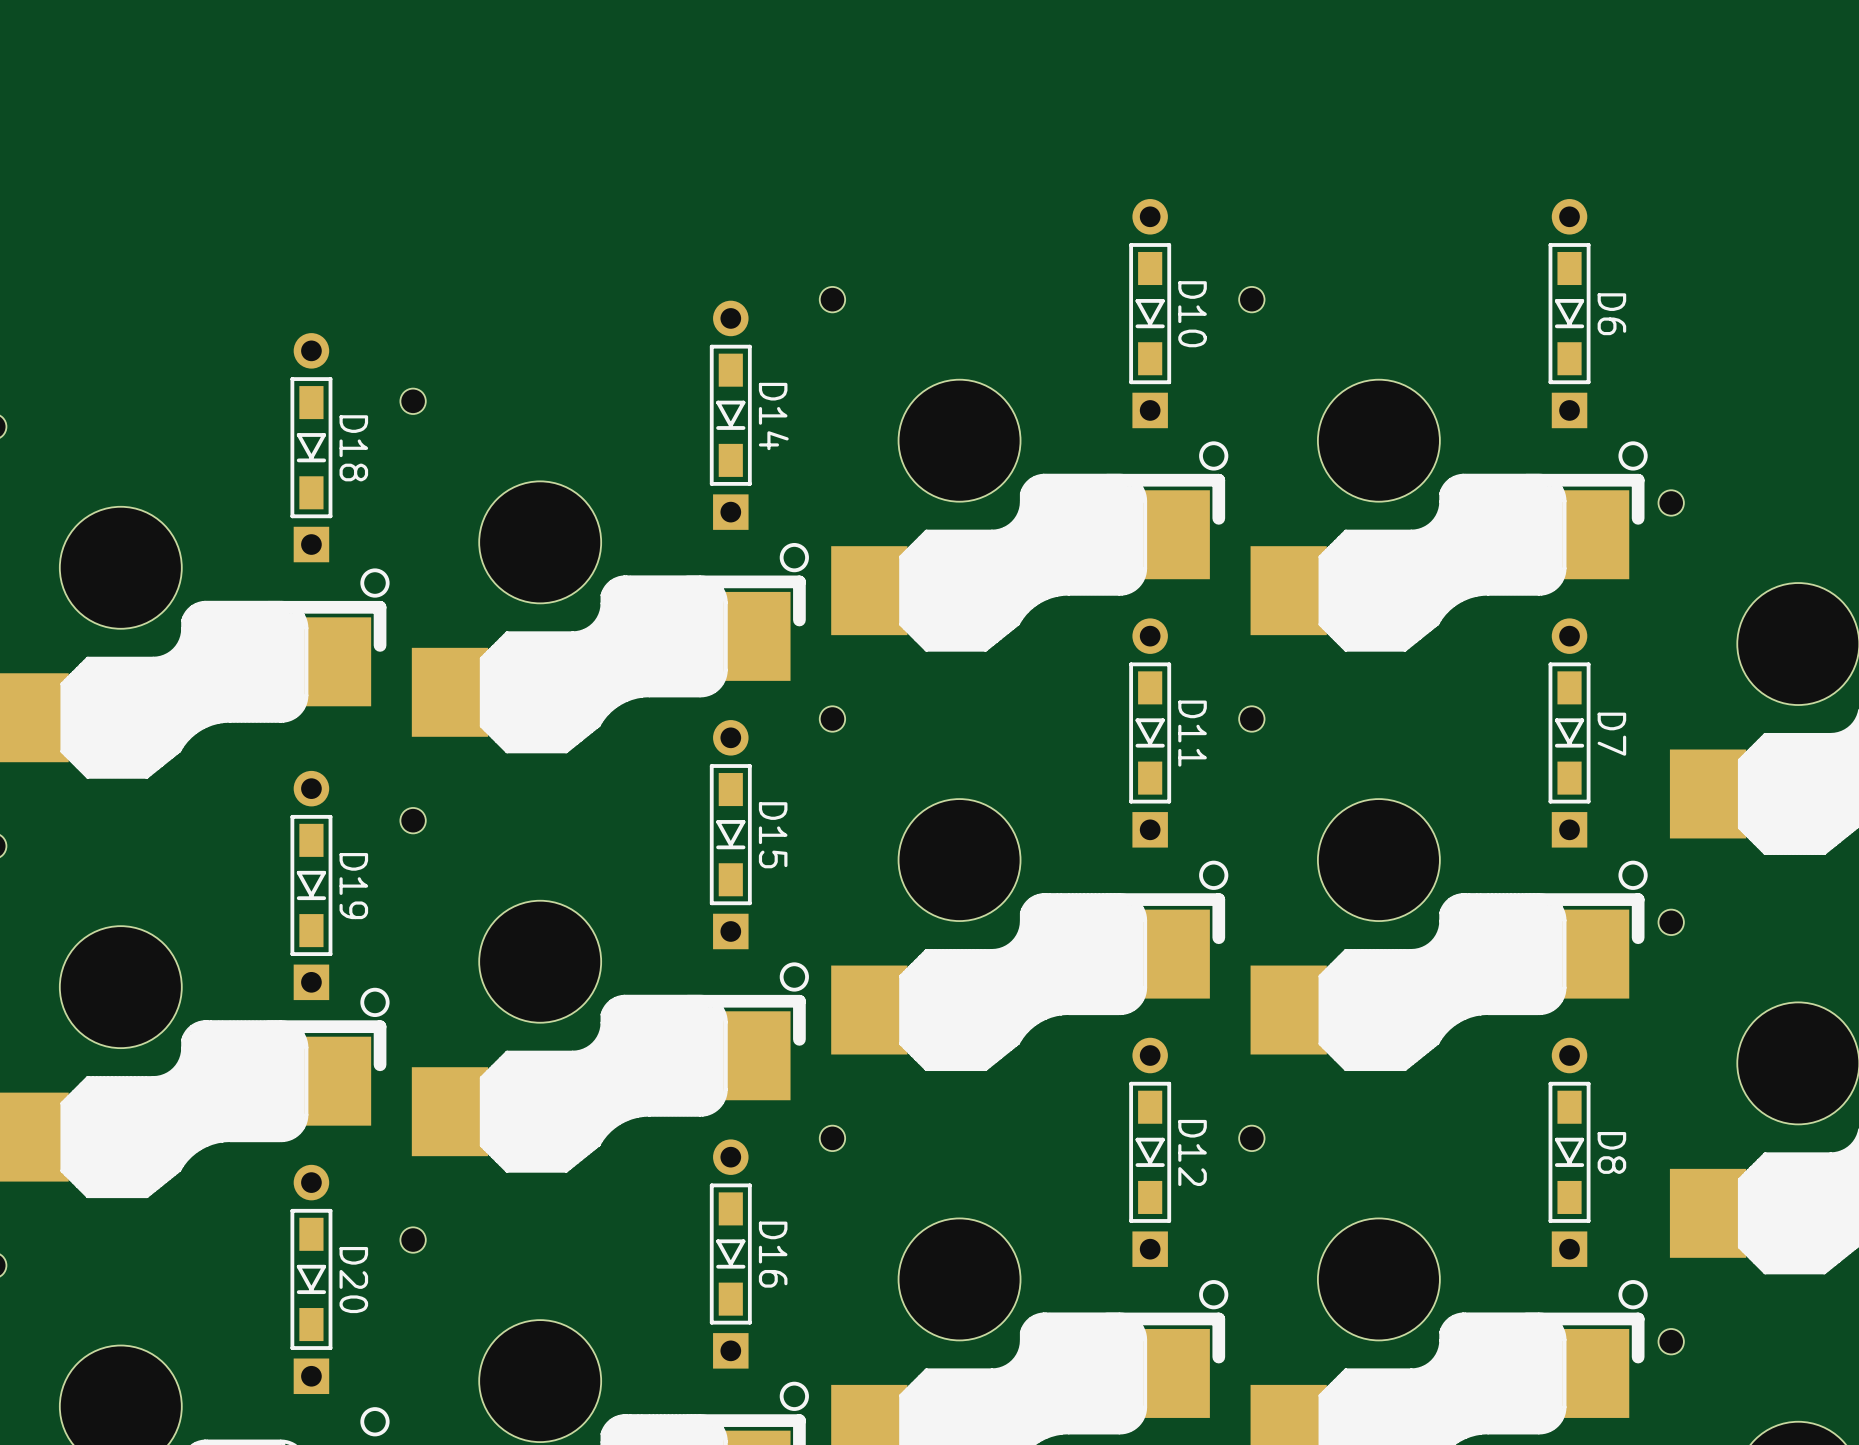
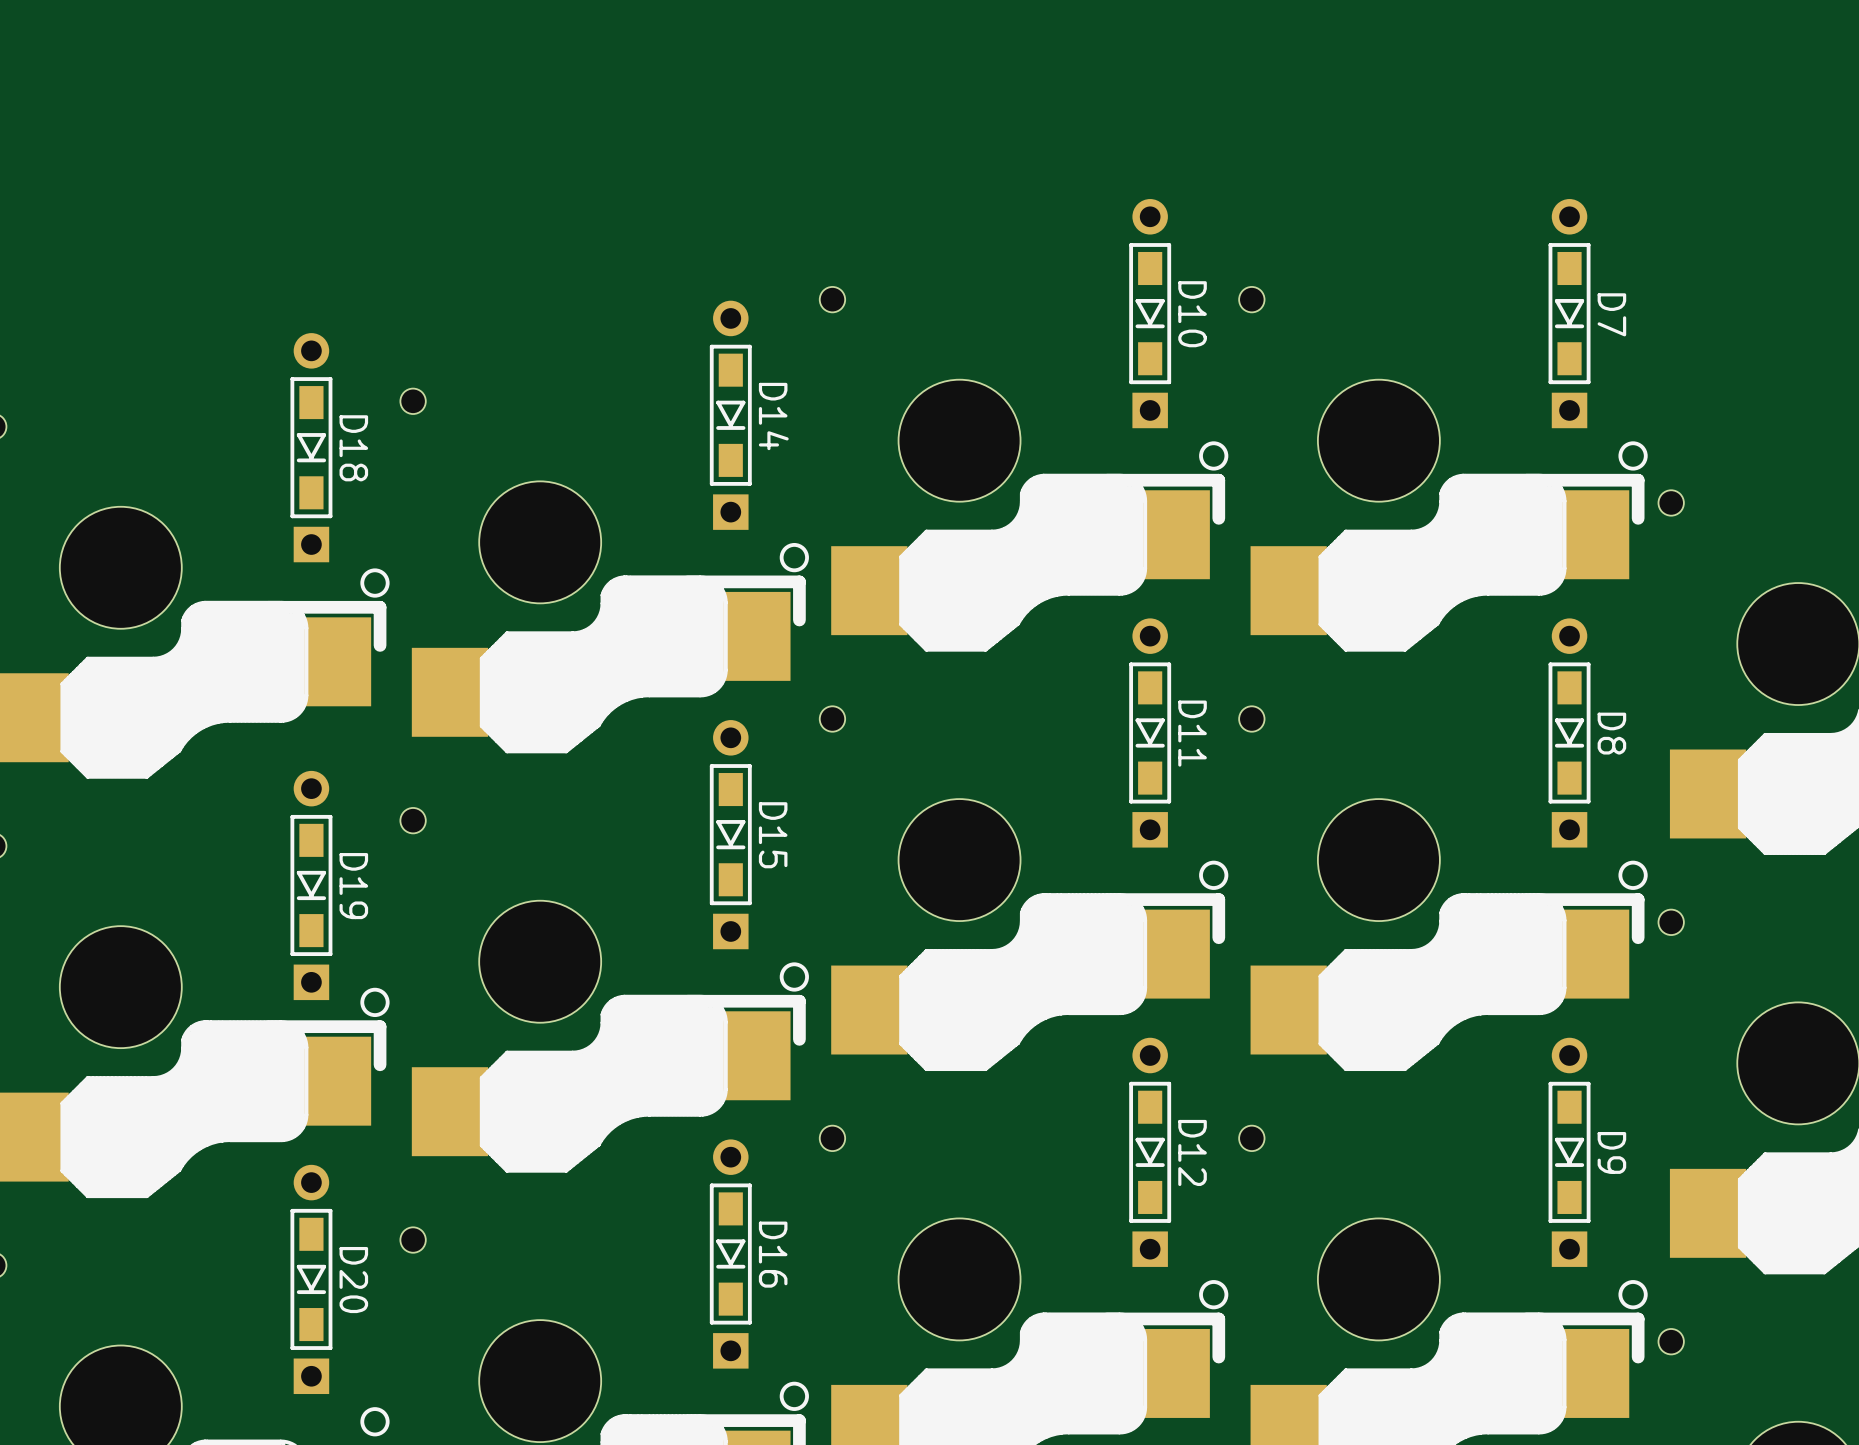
D6 name: D6 (1611, 314) -> D7 (1611, 314)
D7 name: D7 (1611, 734) -> D8 (1611, 733)
D8 name: D8 (1611, 1152) -> D9 (1611, 1152)

